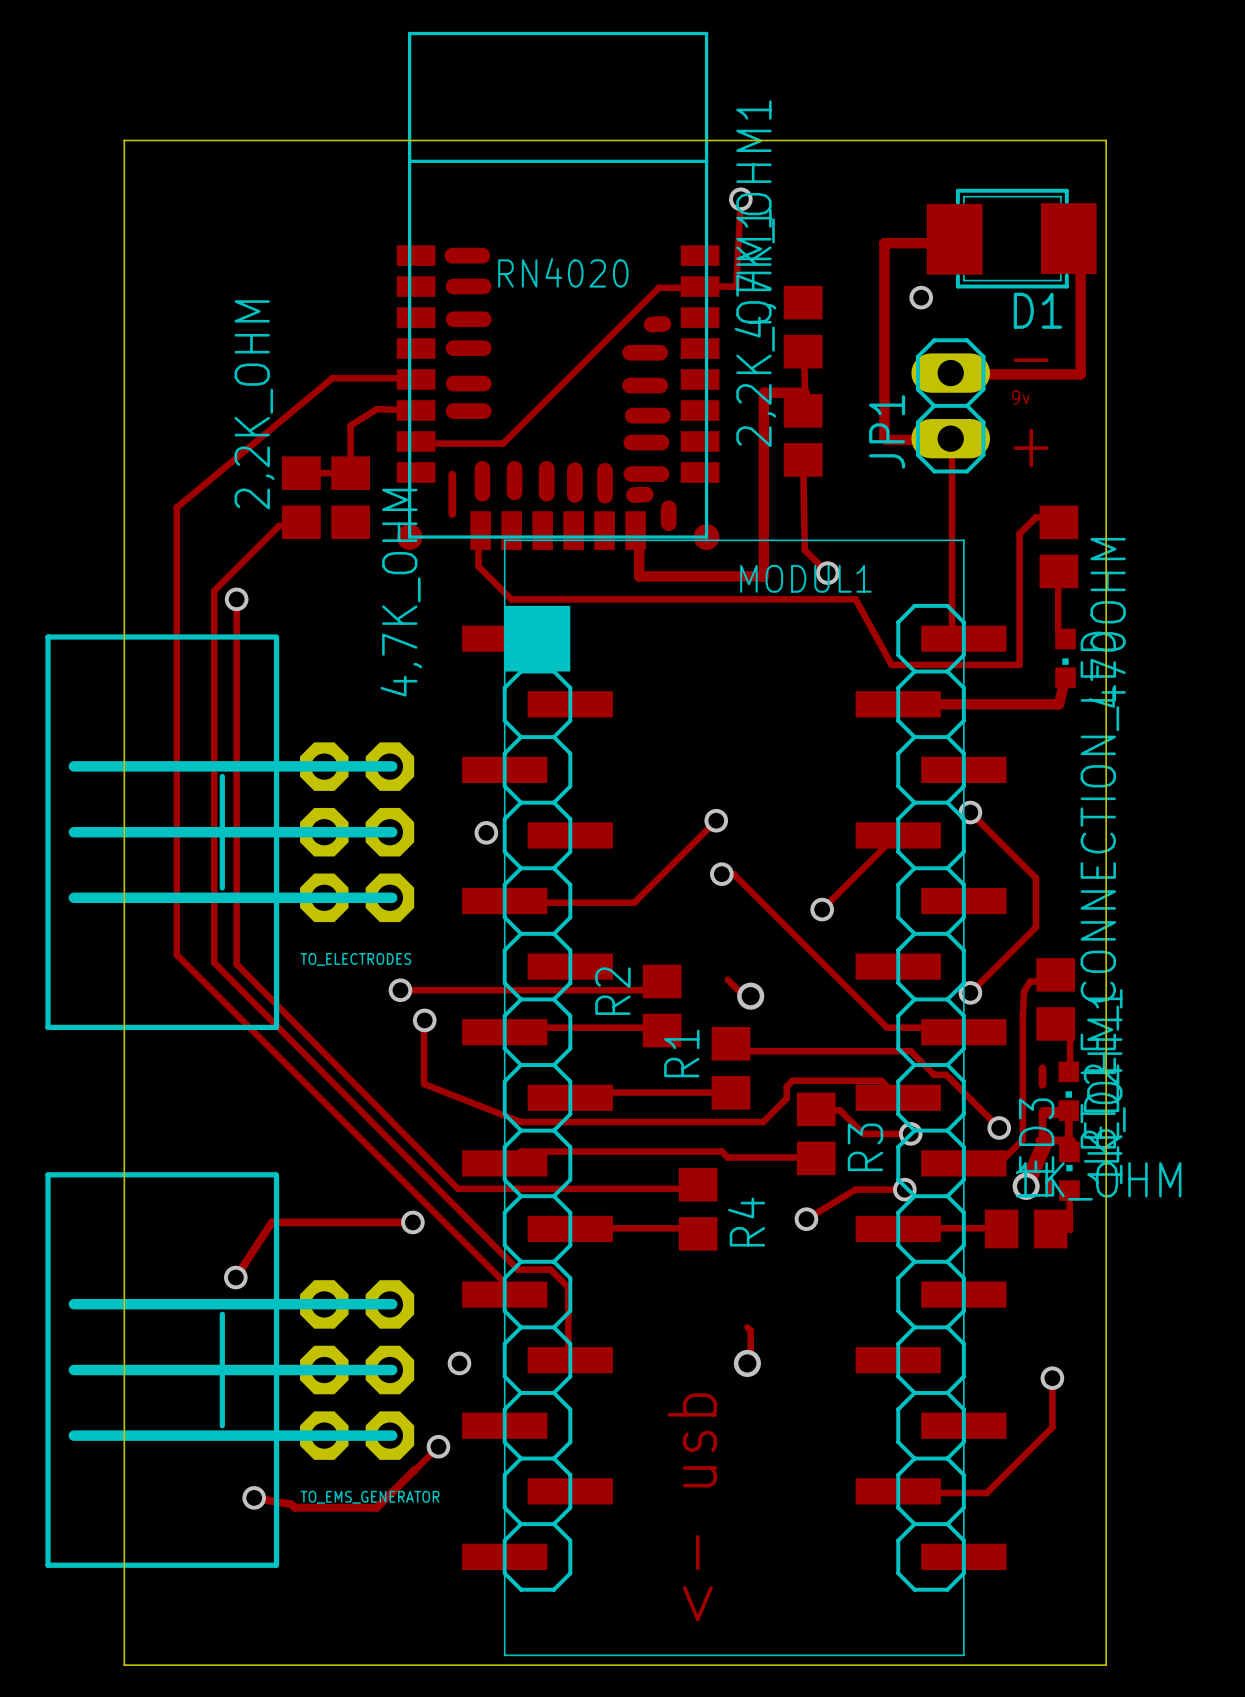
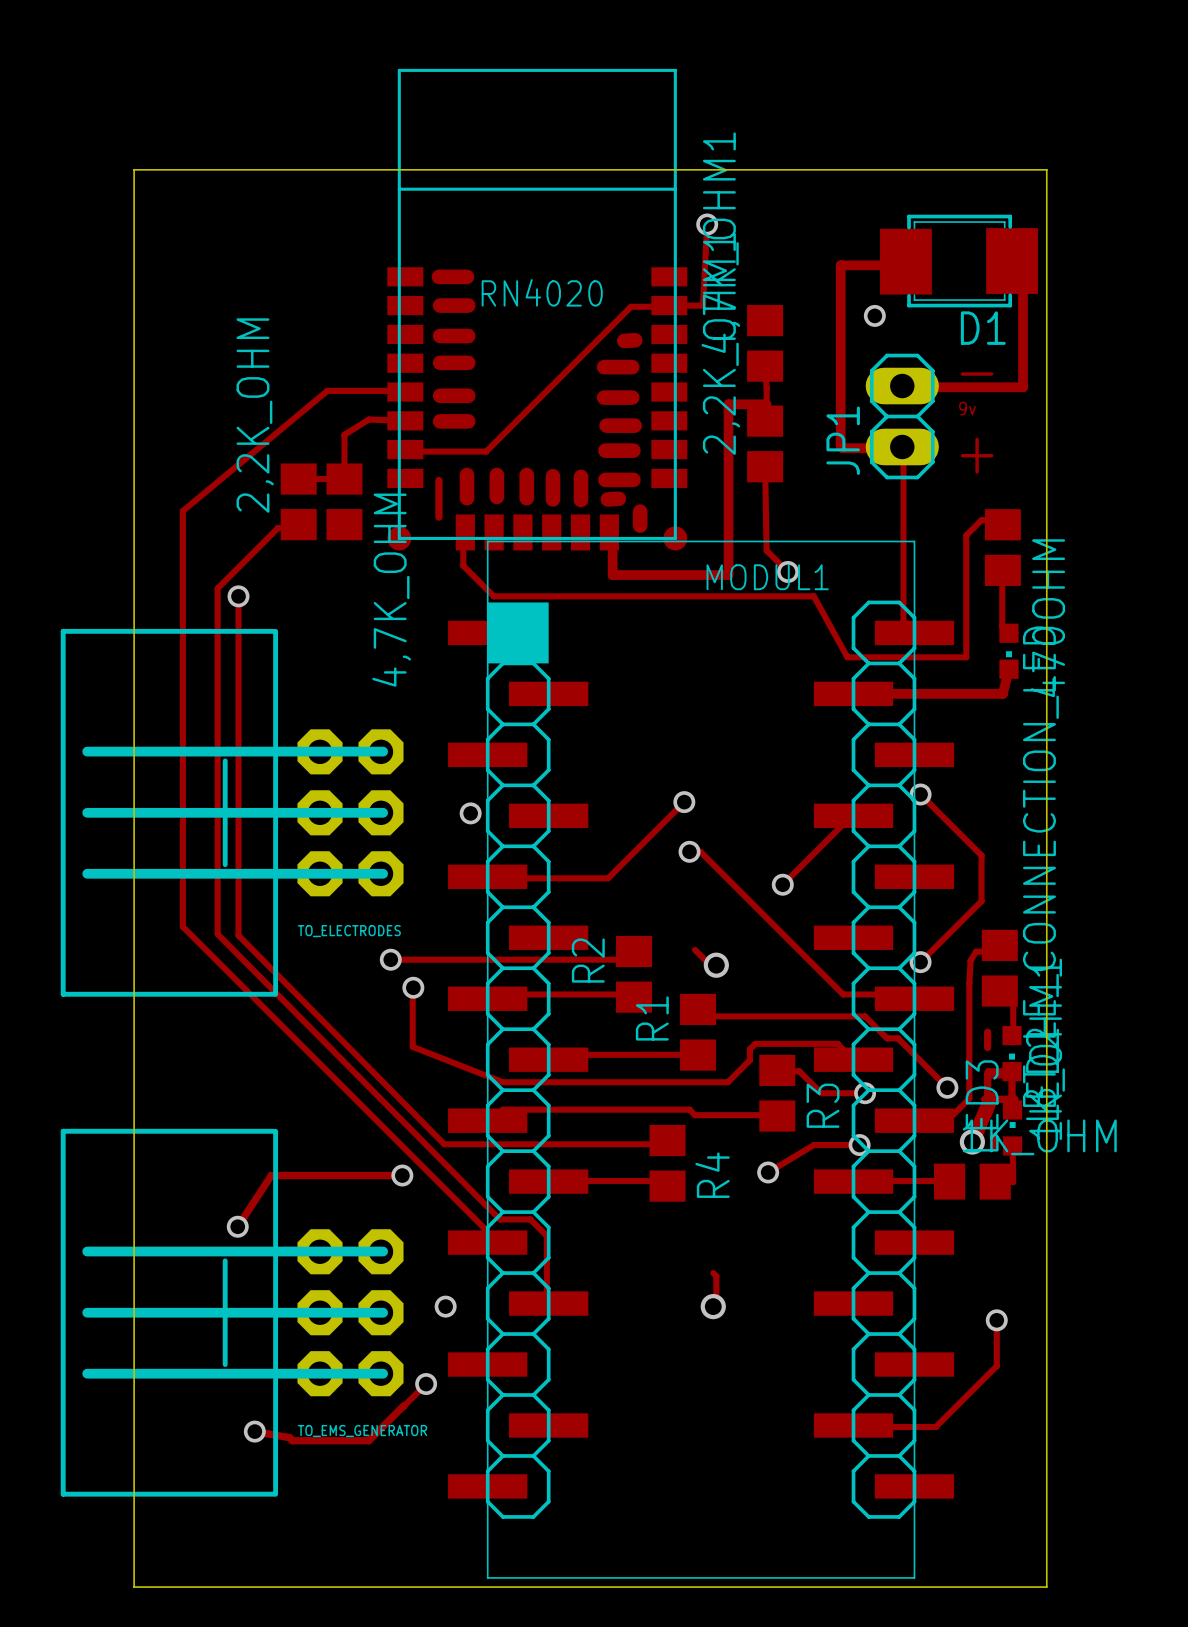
text: <- usb (692, 1507) -> none

